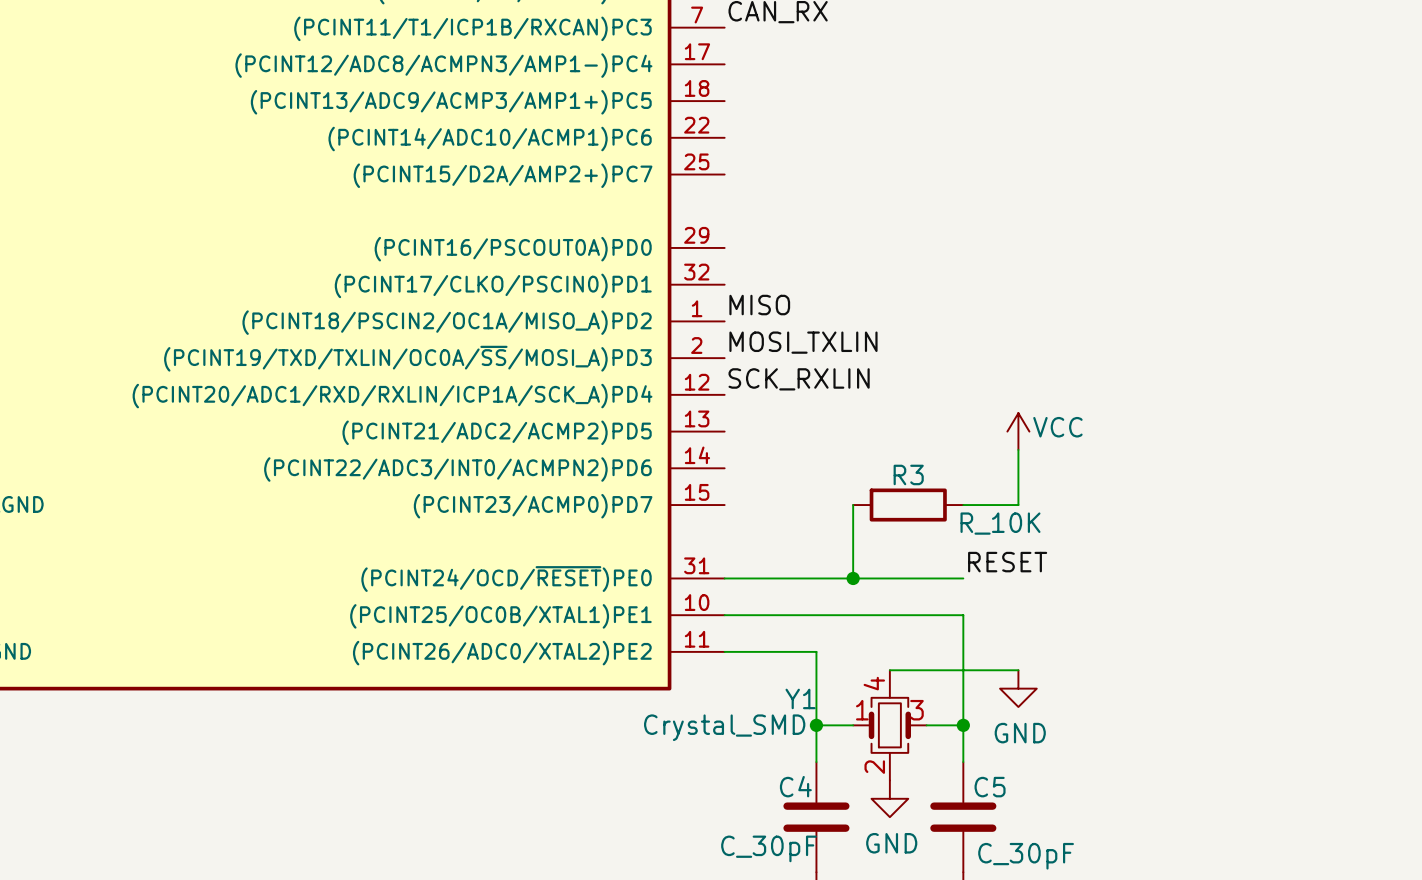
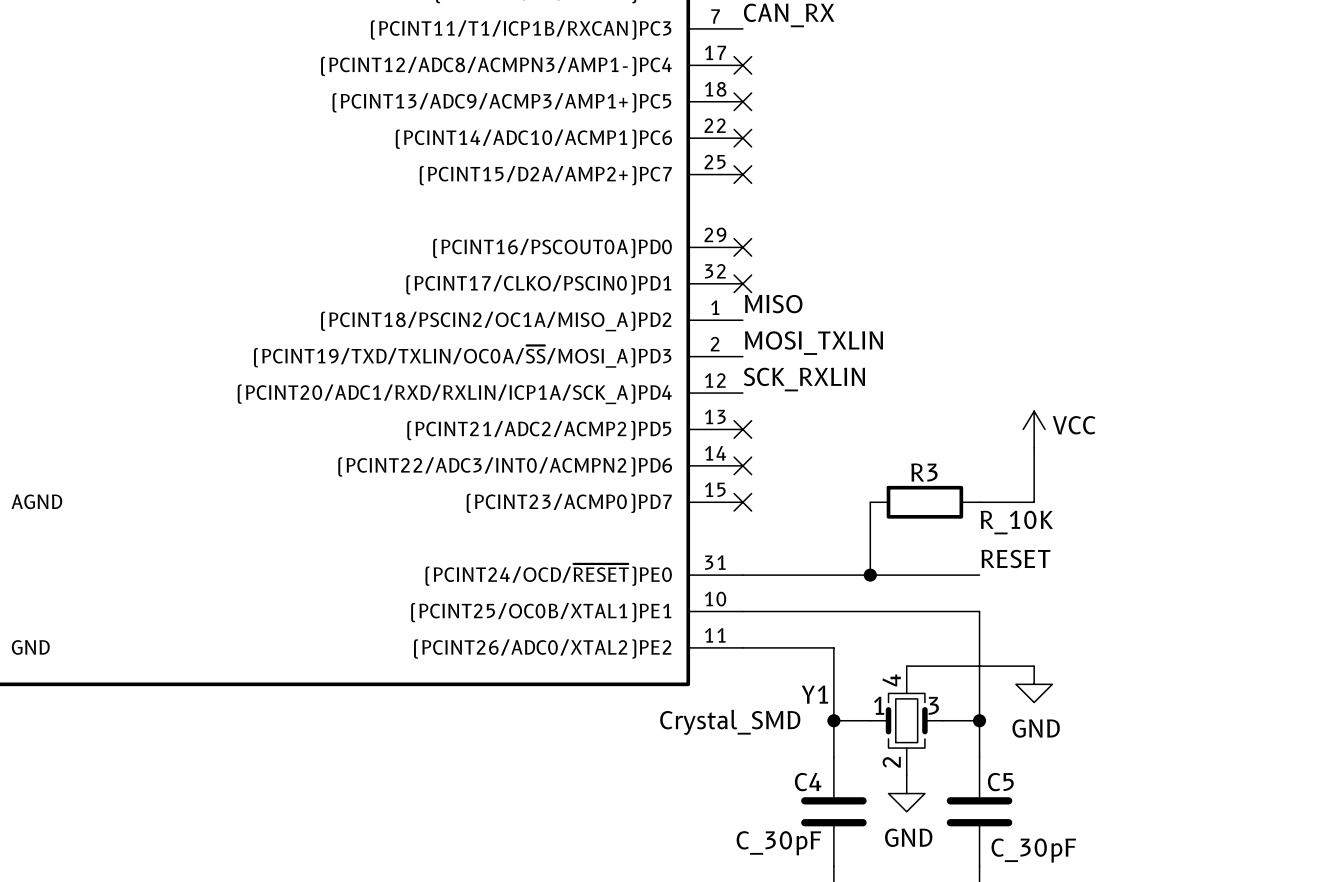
no-connect mark: none -> (742, 65)
no-connect mark: none -> (742, 101)
no-connect mark: none -> (742, 138)
no-connect mark: none -> (742, 174)
no-connect mark: none -> (742, 247)
no-connect mark: none -> (742, 283)
no-connect mark: none -> (742, 429)
no-connect mark: none -> (742, 465)
no-connect mark: none -> (742, 502)

